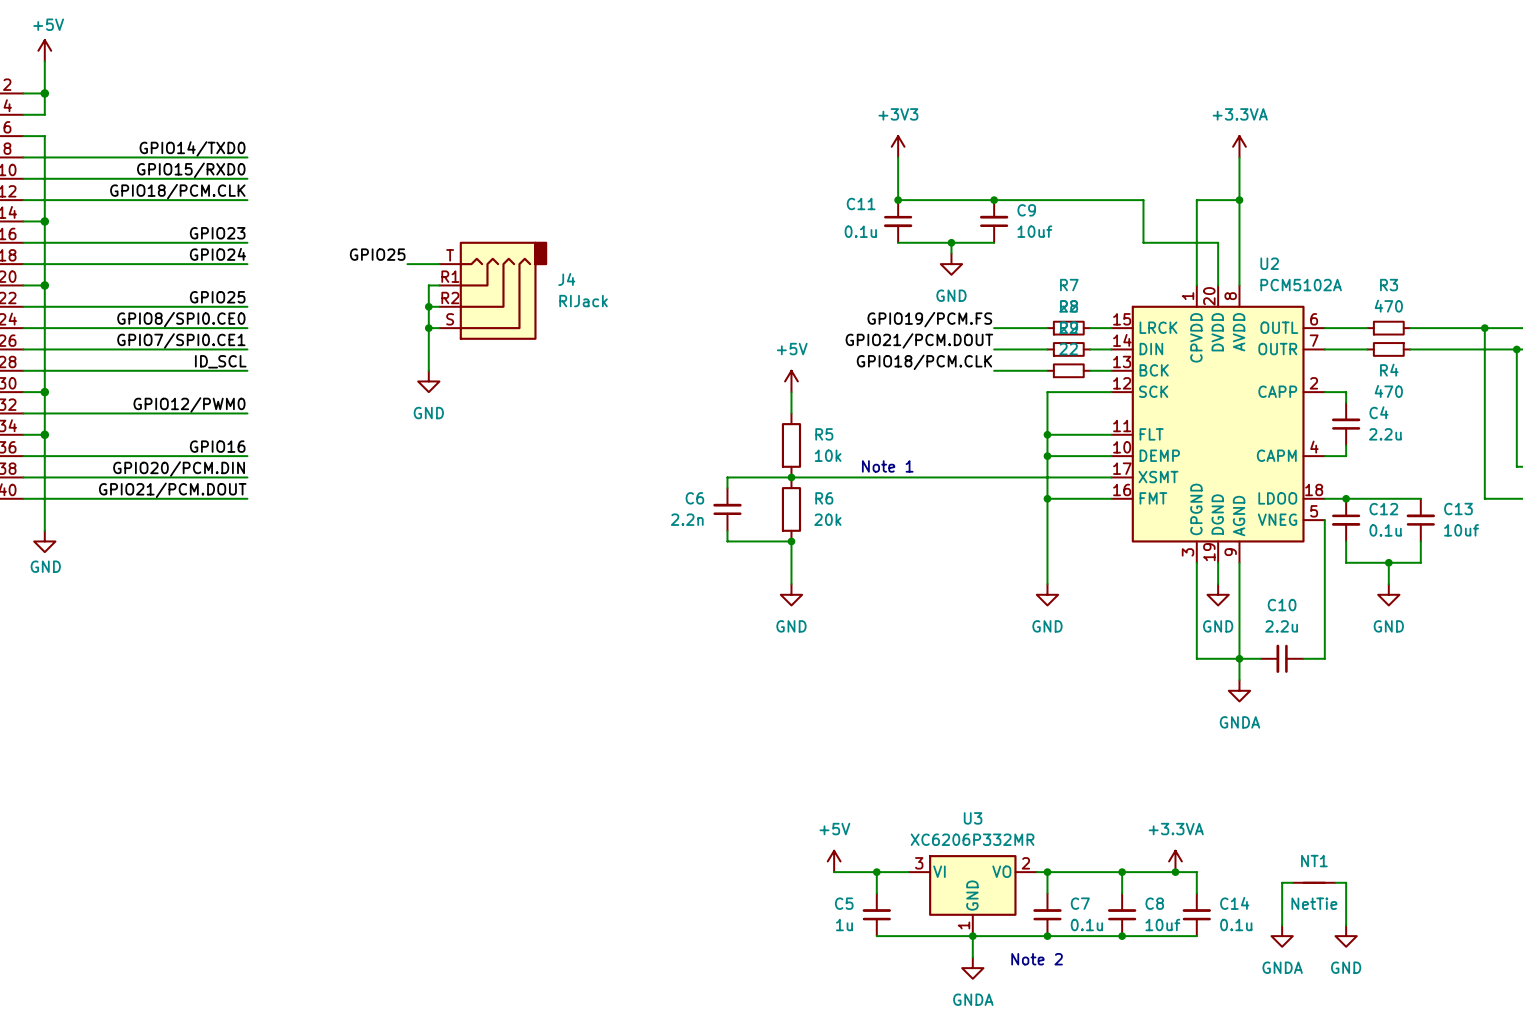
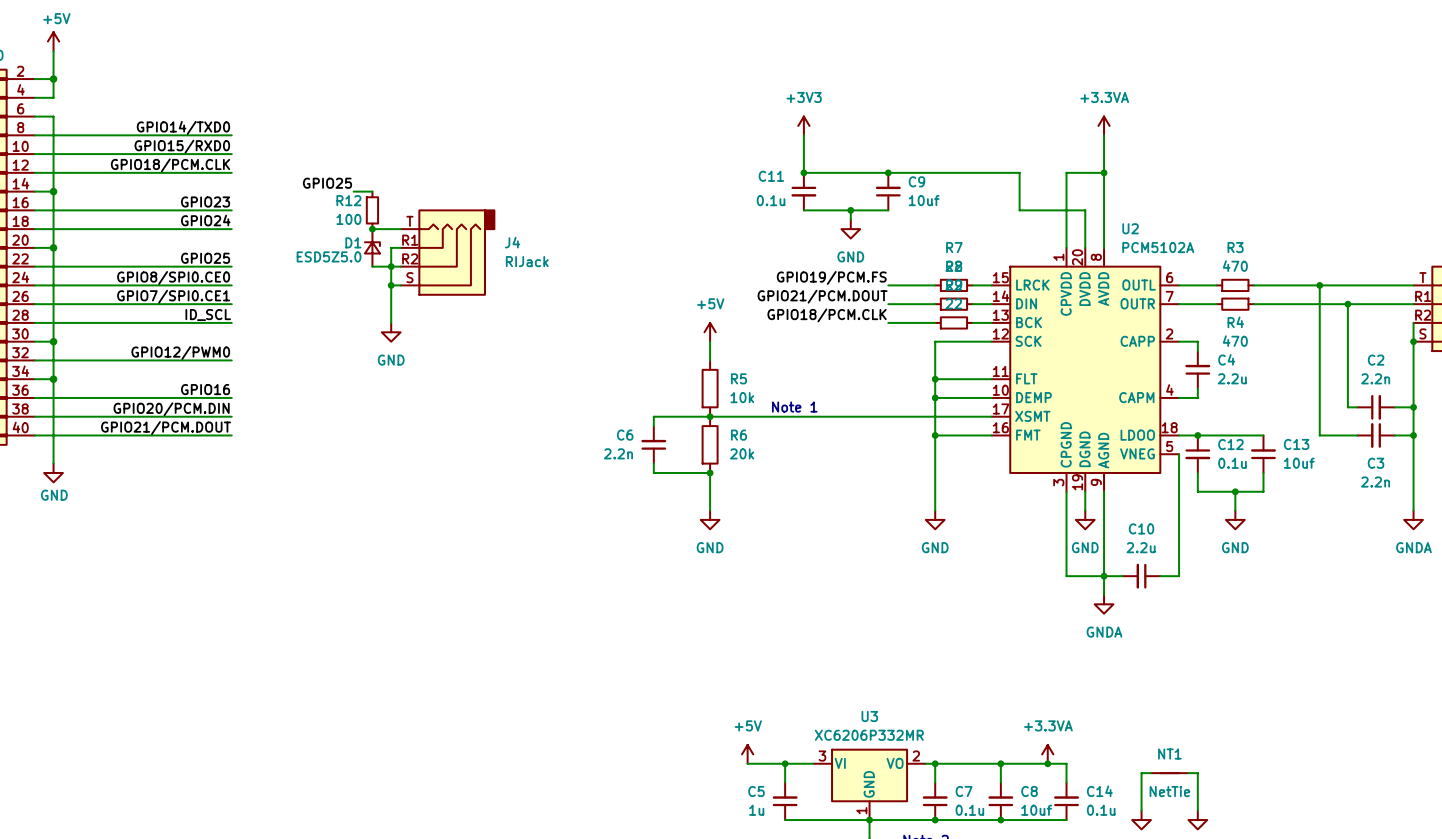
wire: none -> (353, 191) (372, 191)
R12: none -> 100 (372, 210)
label position: GPIO25 (377, 254) -> GPIO25 (327, 183)
junction: none -> (372, 229)
D1: none -> ESD5Z5.0 (372, 247)
wire: none -> (372, 266) (391, 266)

